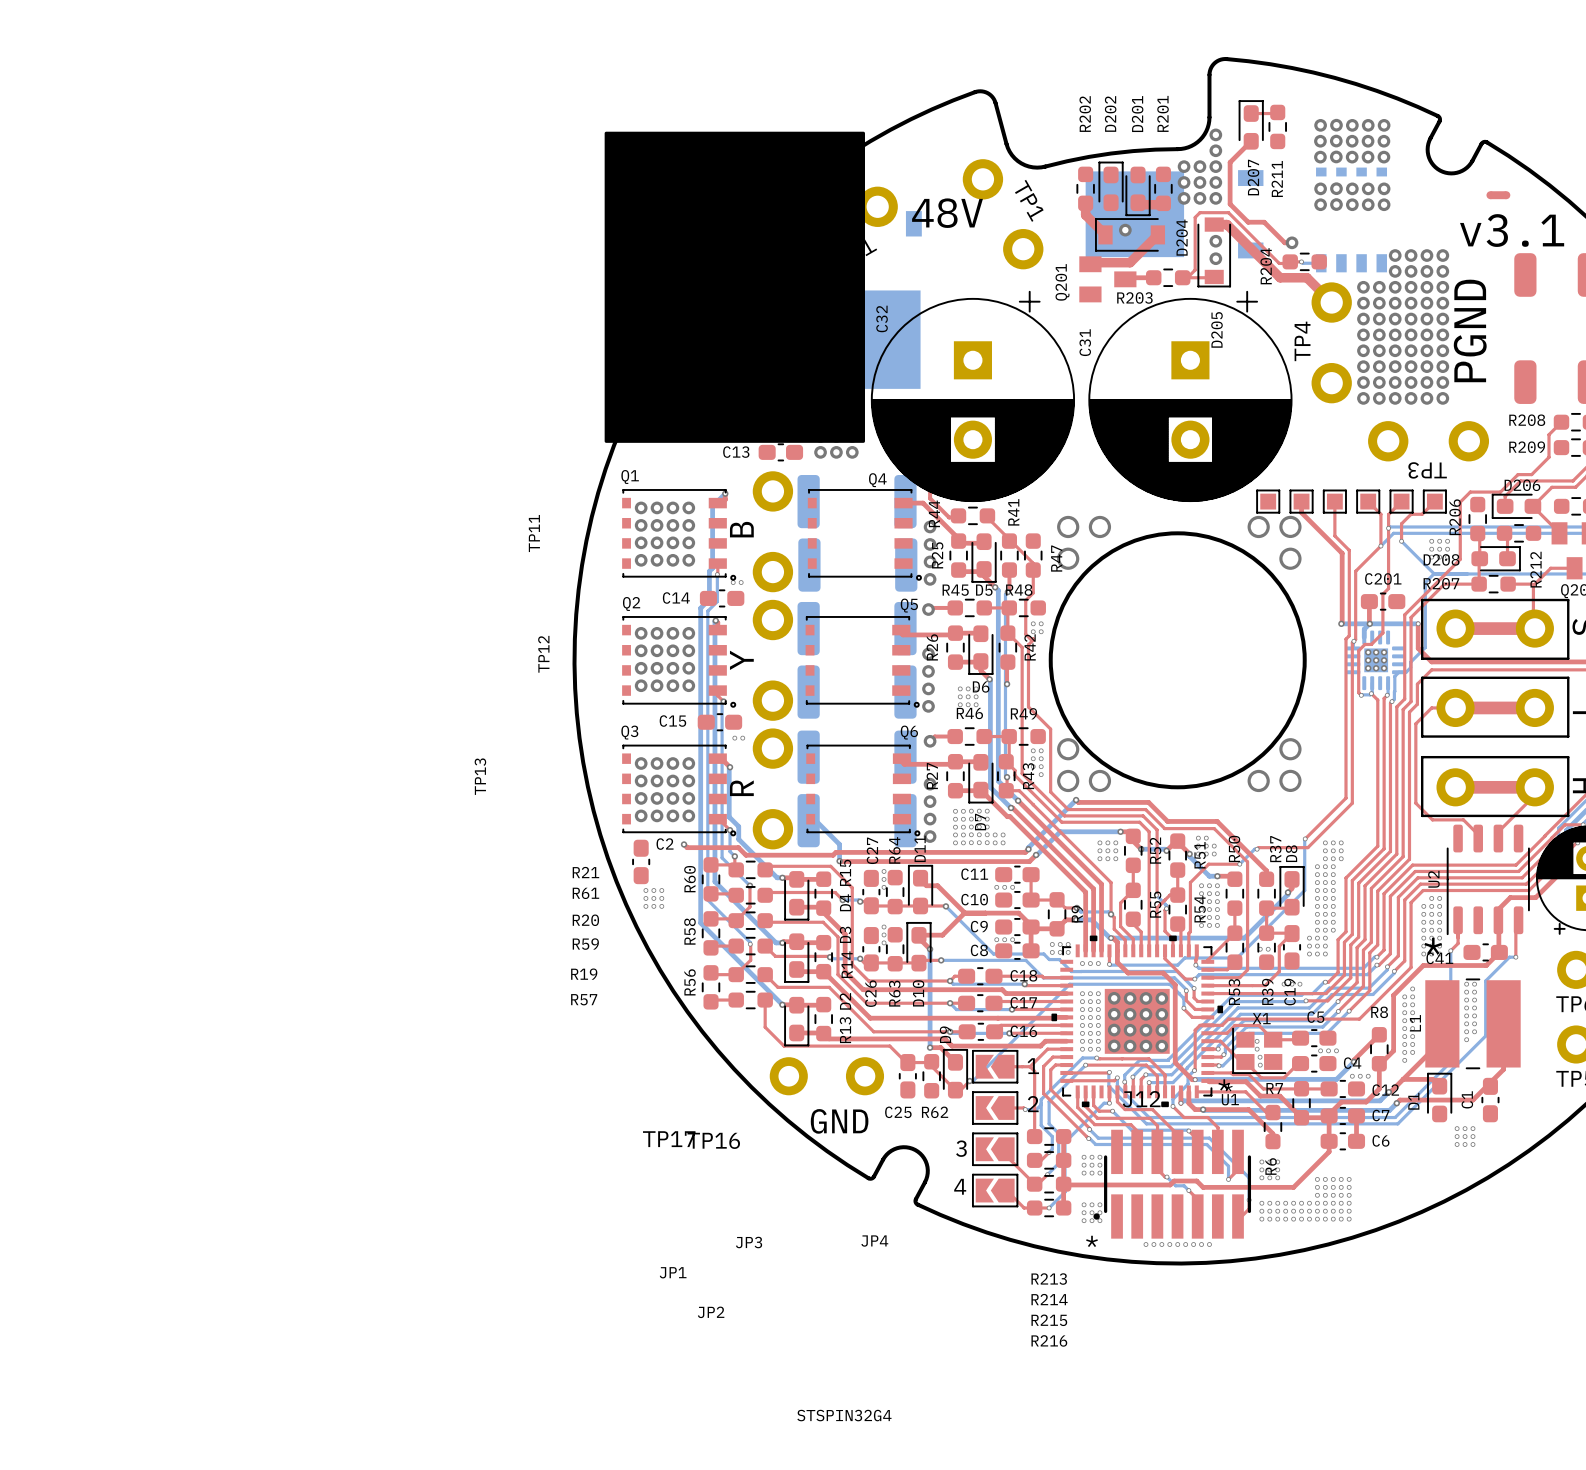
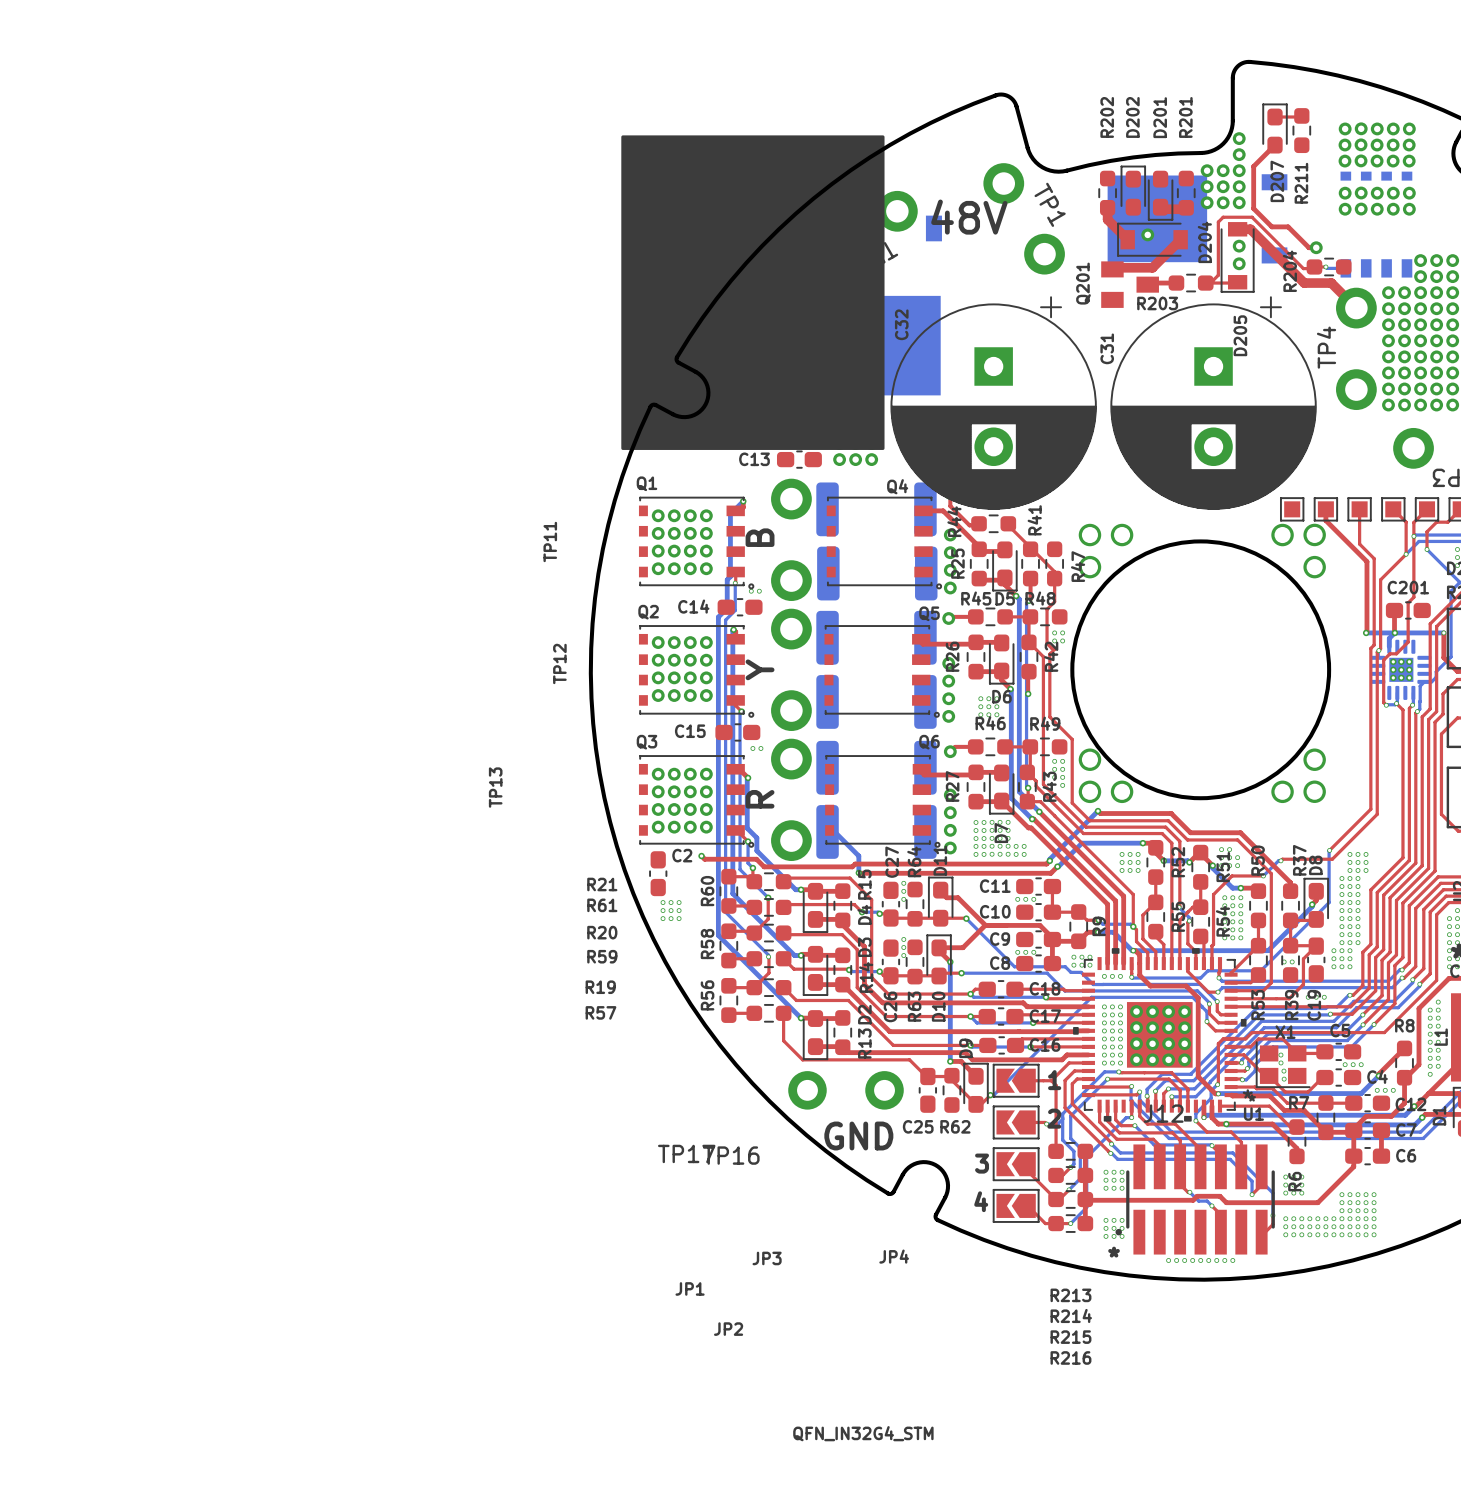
U1 value: STSPIN32G4 (844, 1415) -> QFN_IN32G4_STM (863, 1433)

